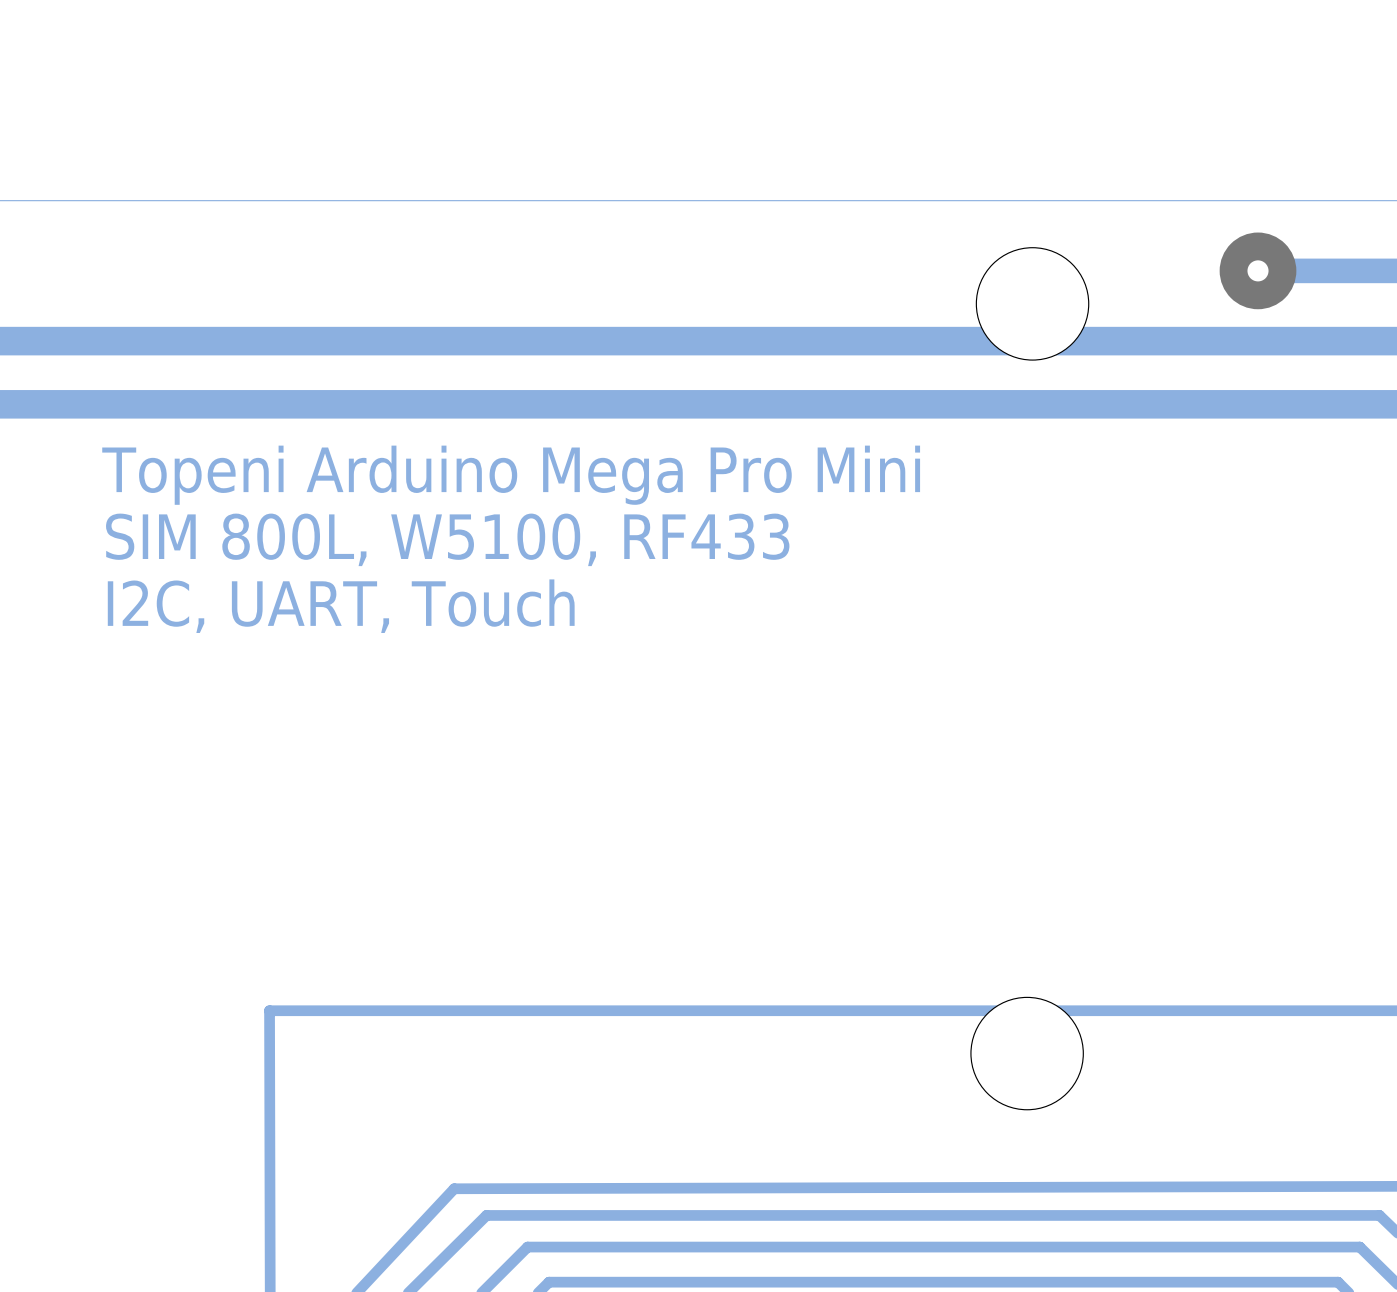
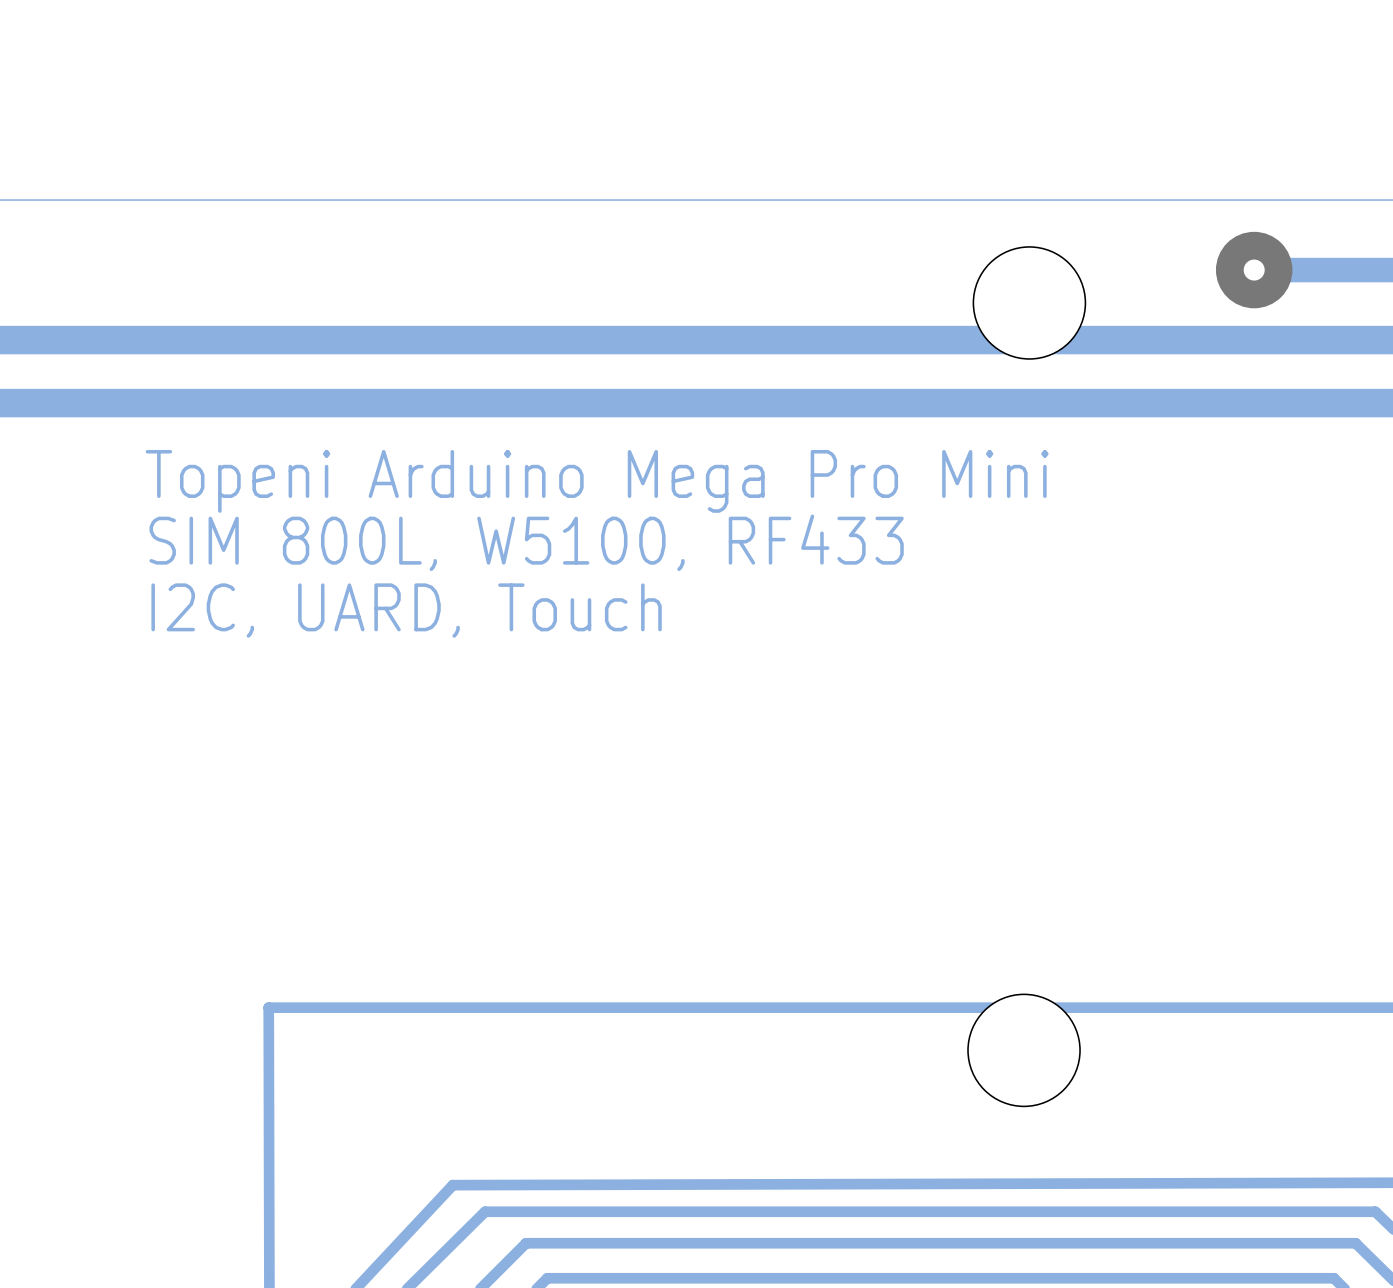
text position: Topeni Arduino Mega Pro Mini (511, 475) -> Topeni Arduino Mega Pro Mini (597, 481)
text position: SIM 800L, W5100, RF433 (447, 539) -> SIM 800L, W5100, RF433 (526, 542)
text: I2C, UART, Touch (341, 606) -> I2C, UARD, Touch (406, 610)

